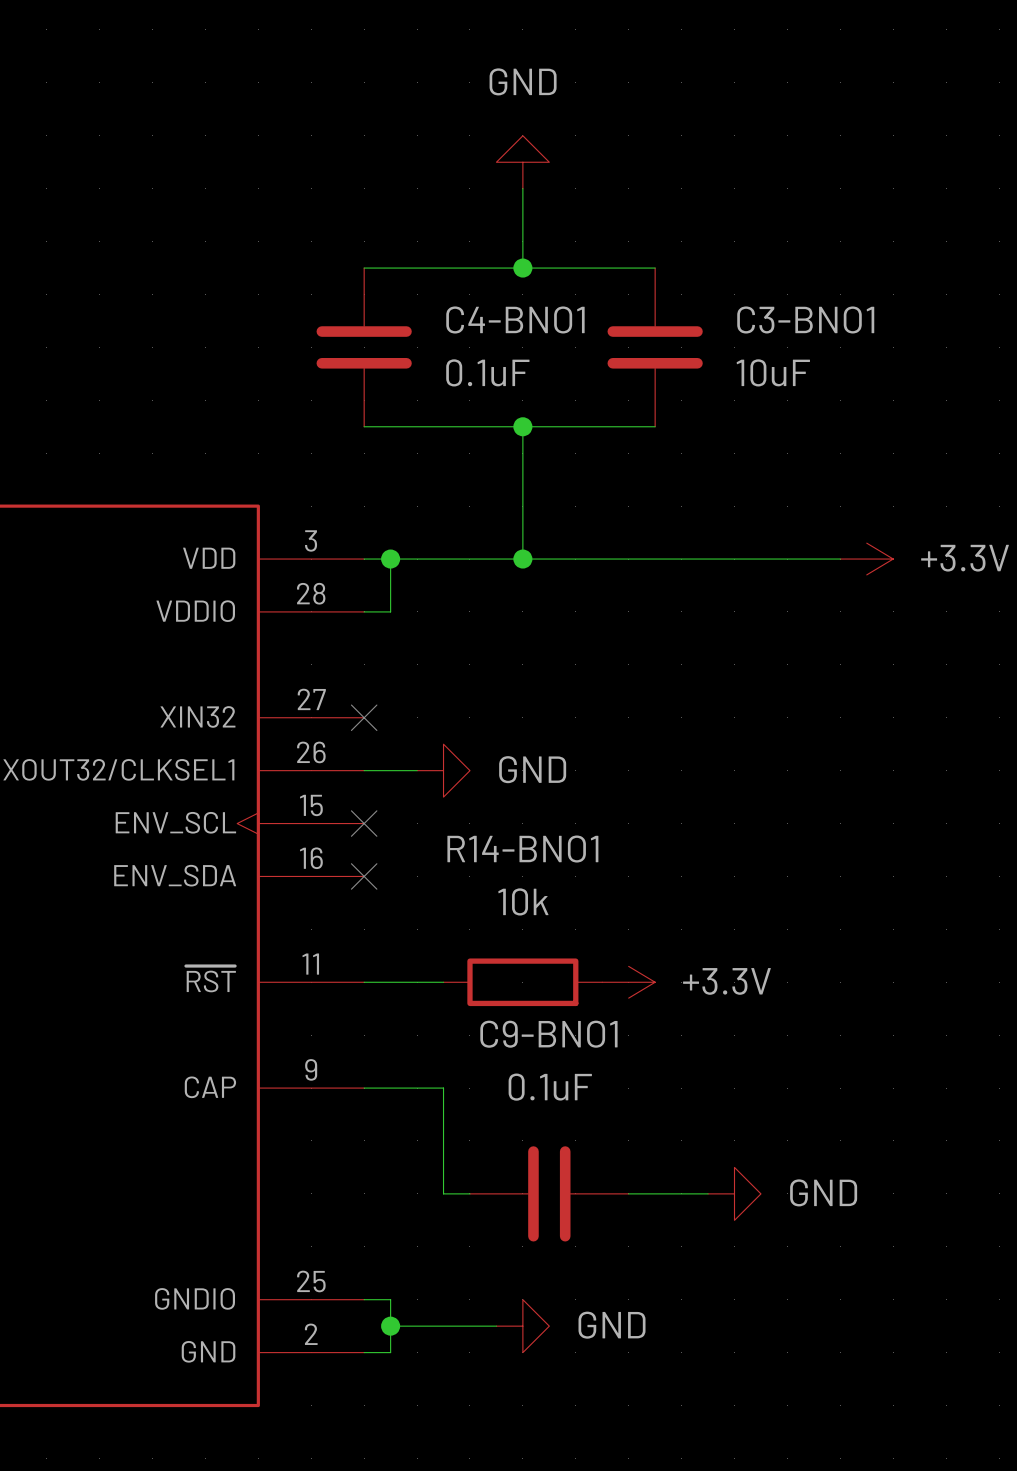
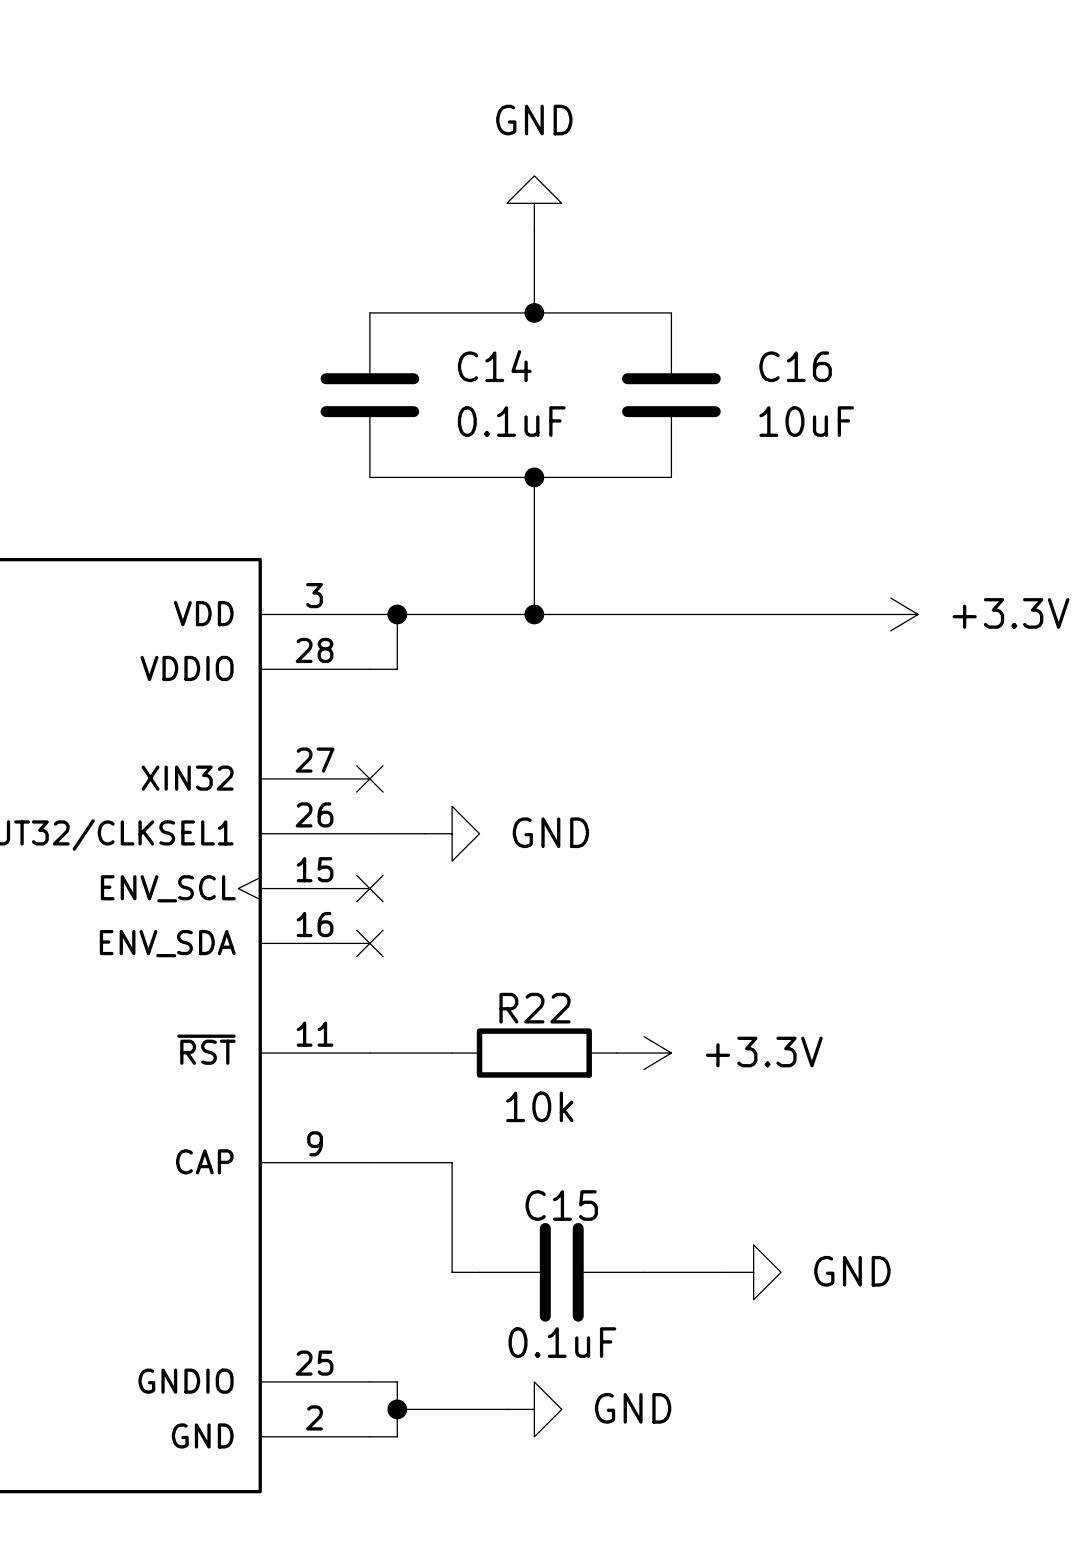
C4-BNO1 name: C4-BNO1 (515, 319) -> C14 (494, 366)
C3-BNO1 name: C3-BNO1 (805, 319) -> C16 (795, 366)
R14-BNO1 name: R14-BNO1 (522, 849) -> R22 (535, 1008)
R14-BNO1 value position: 10k (523, 901) -> 10k (539, 1106)
C9-BNO1 name: C9-BNO1 (548, 1034) -> C15 (561, 1205)
C9-BNO1 value position: 0.1uF (550, 1087) -> 0.1uF (562, 1342)

